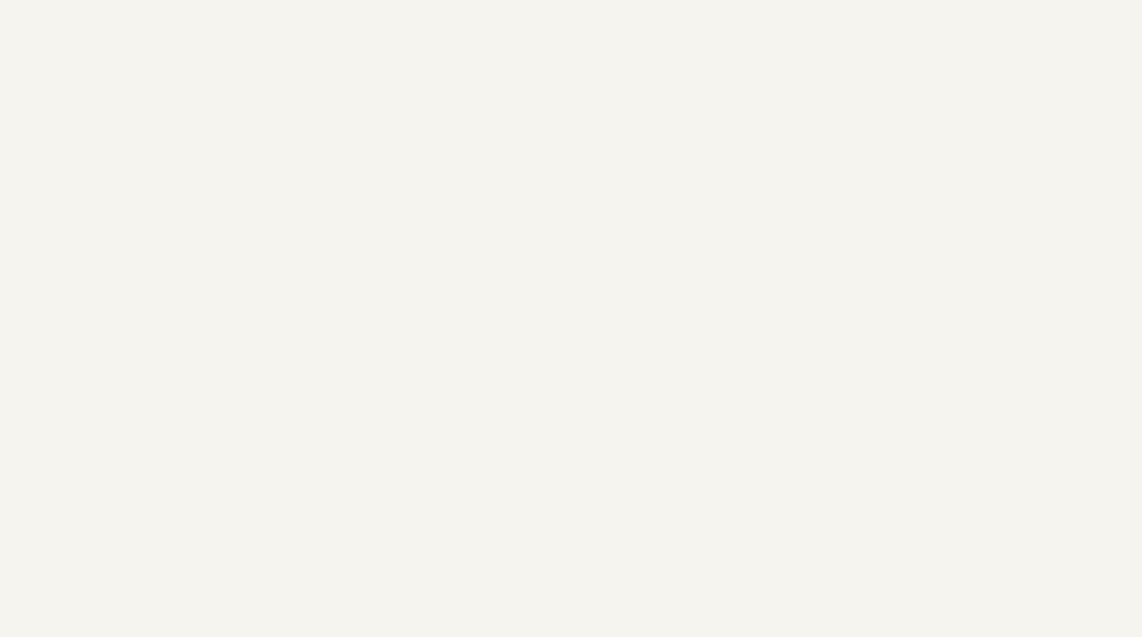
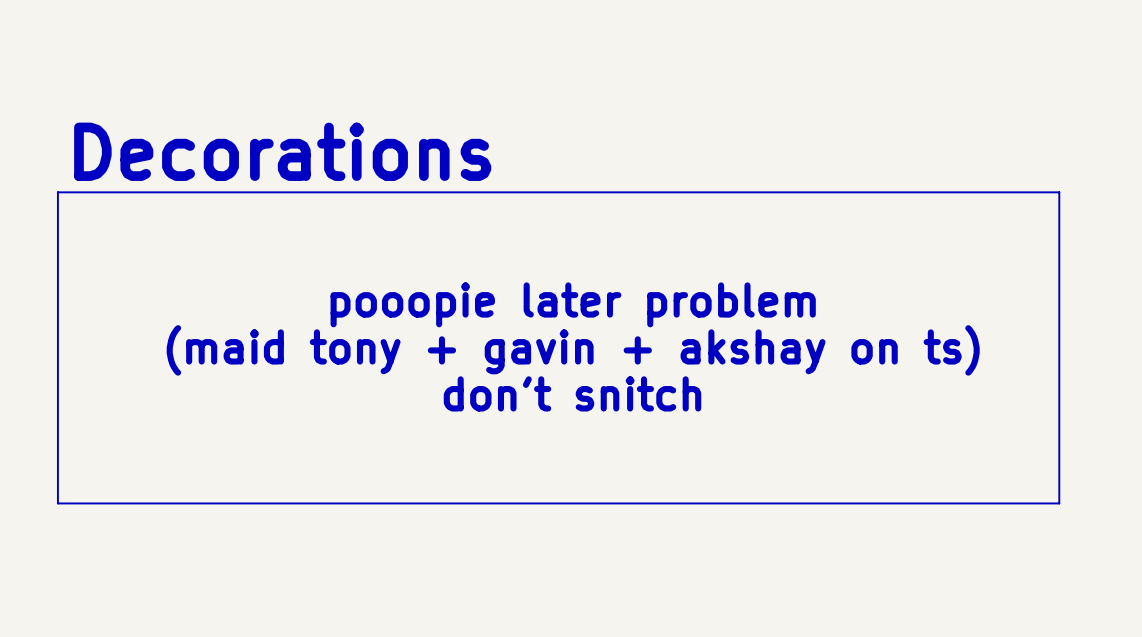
text: none -> Decorations (282, 151)
line: none -> (57, 192) (1059, 192) (1059, 503) (57, 503) (57, 192)
text: none -> pooopie later problem (573, 304)
text: none -> (maid tony + gavin + akshay on ts) (573, 350)
text: none -> don't snitch (572, 393)

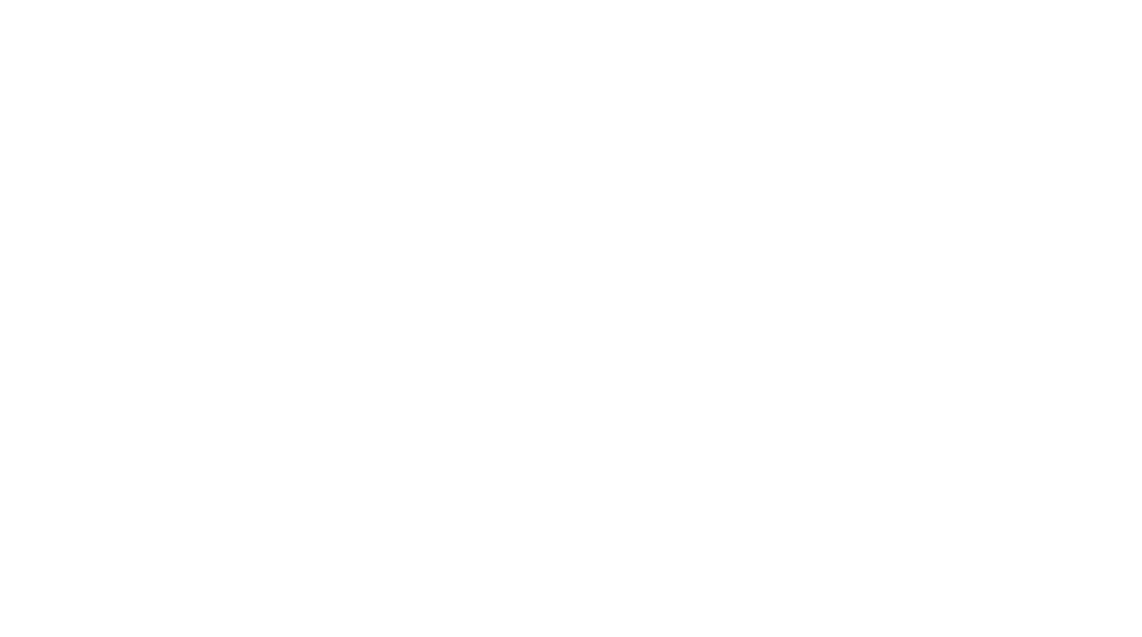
text: Decorations (282, 151) -> none
line: (57, 192) (1059, 192) (1059, 503) (57, 503) (57, 192) -> none
text: pooopie later problem (573, 304) -> none
text: (maid tony + gavin + akshay on ts) (573, 350) -> none
text: don't snitch (572, 393) -> none

